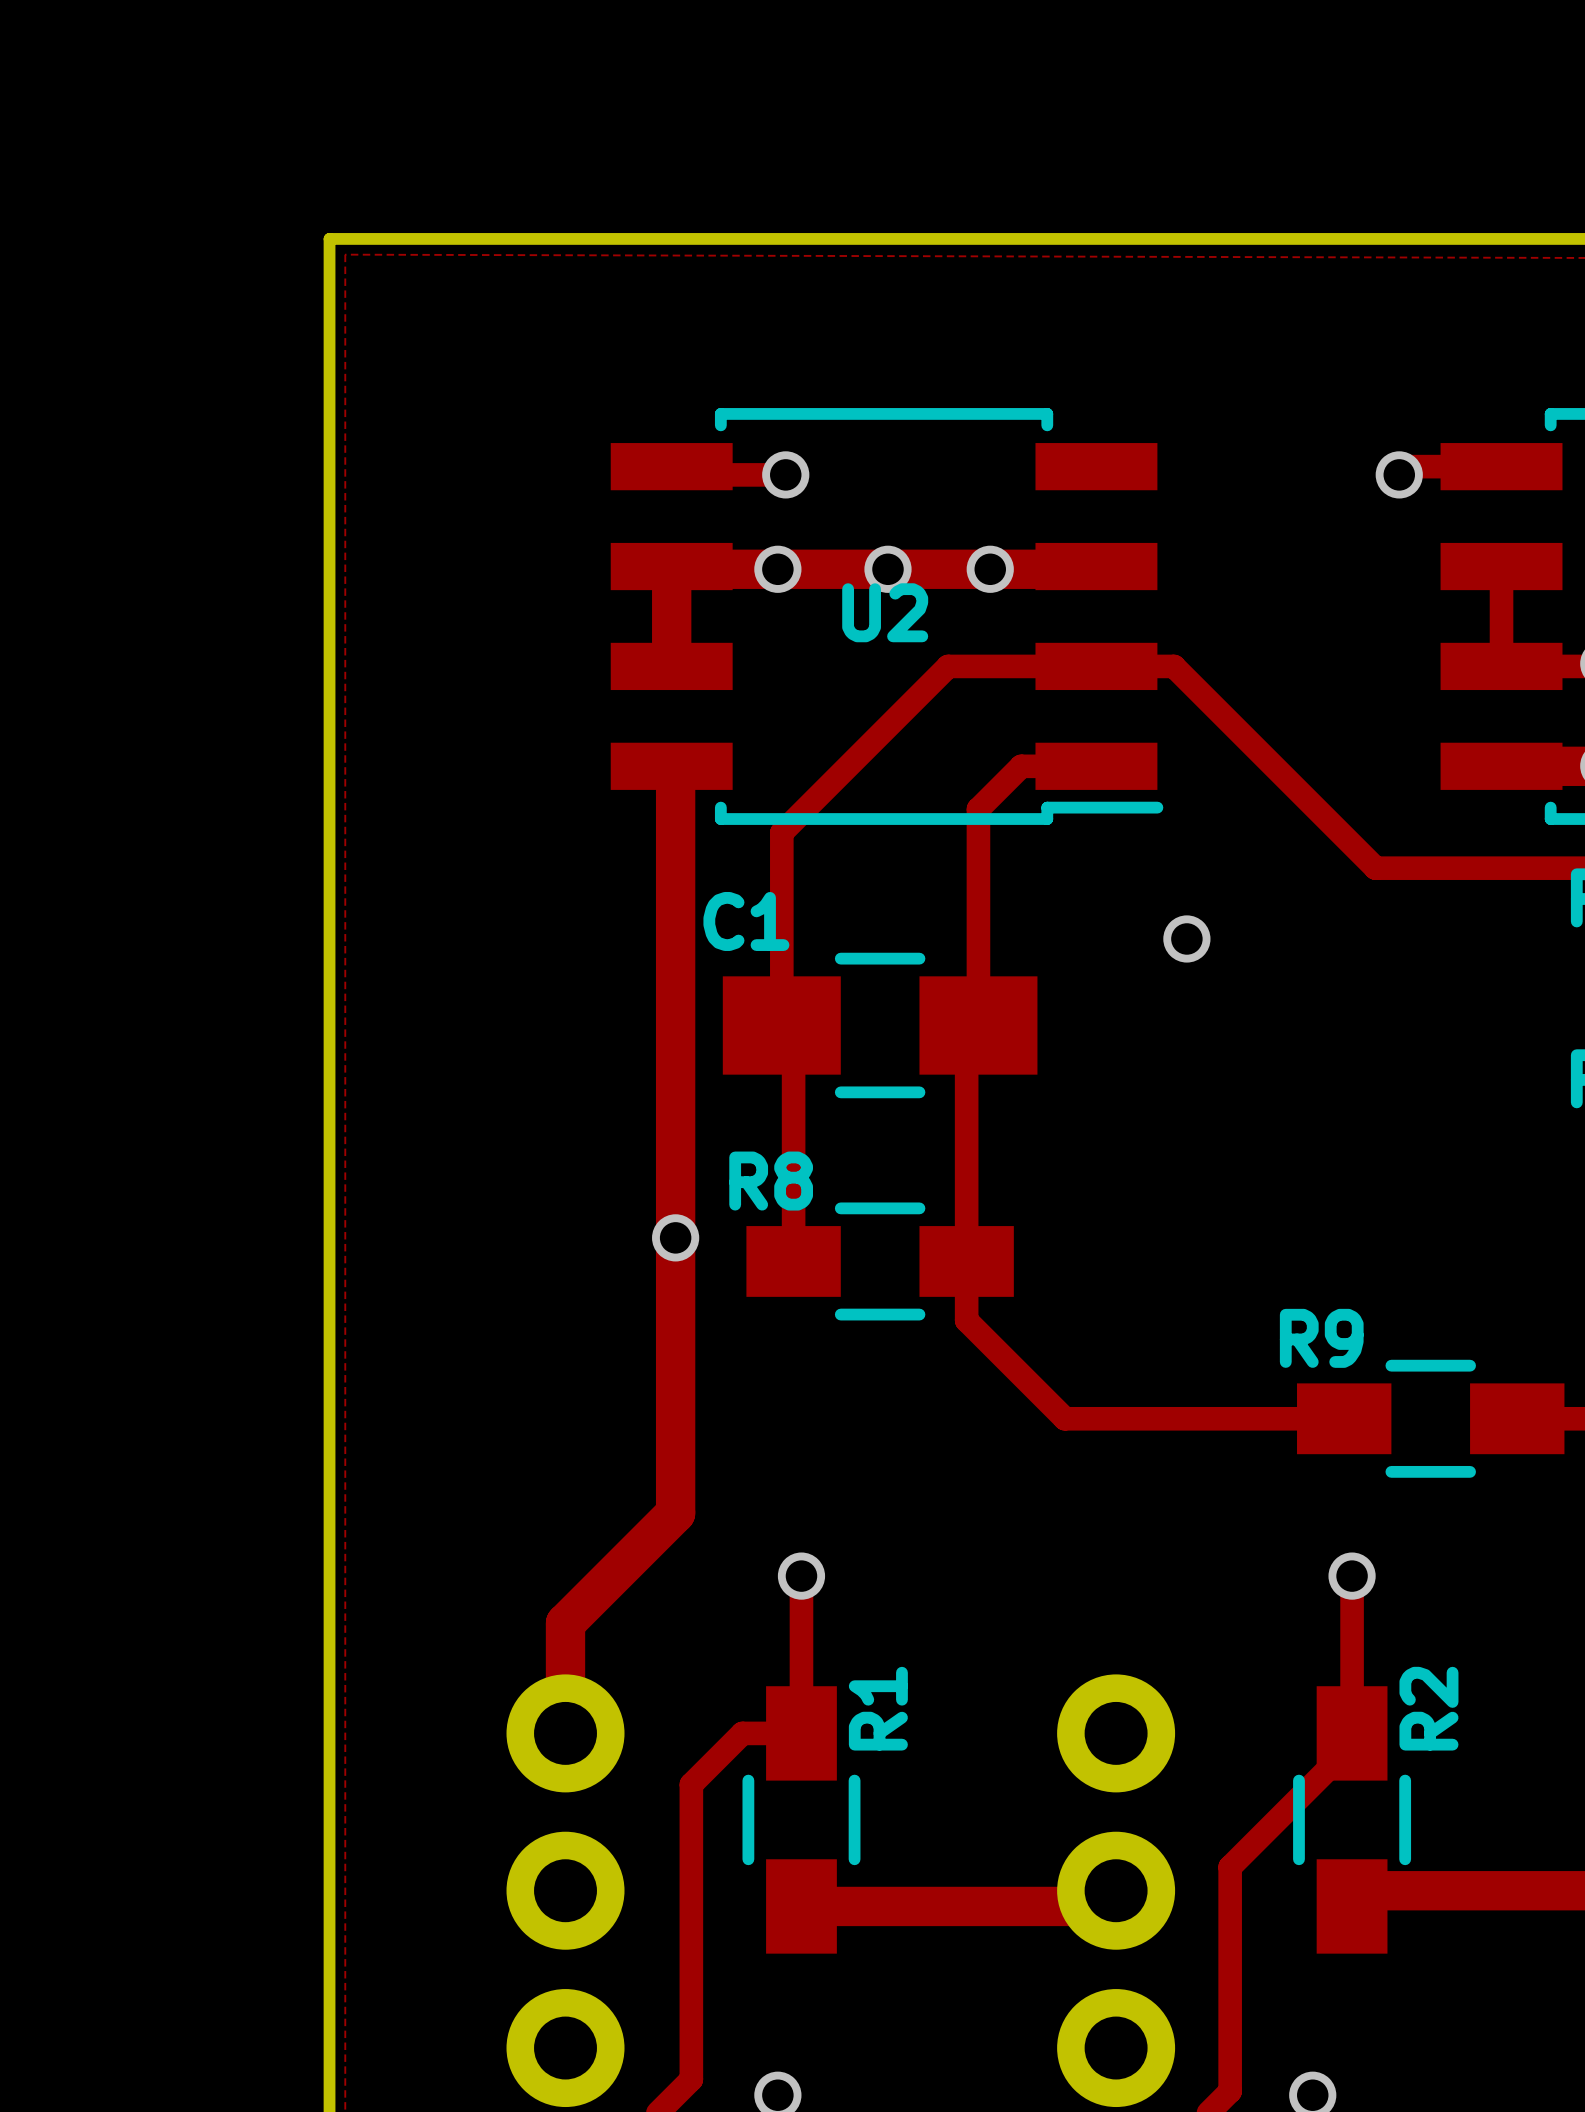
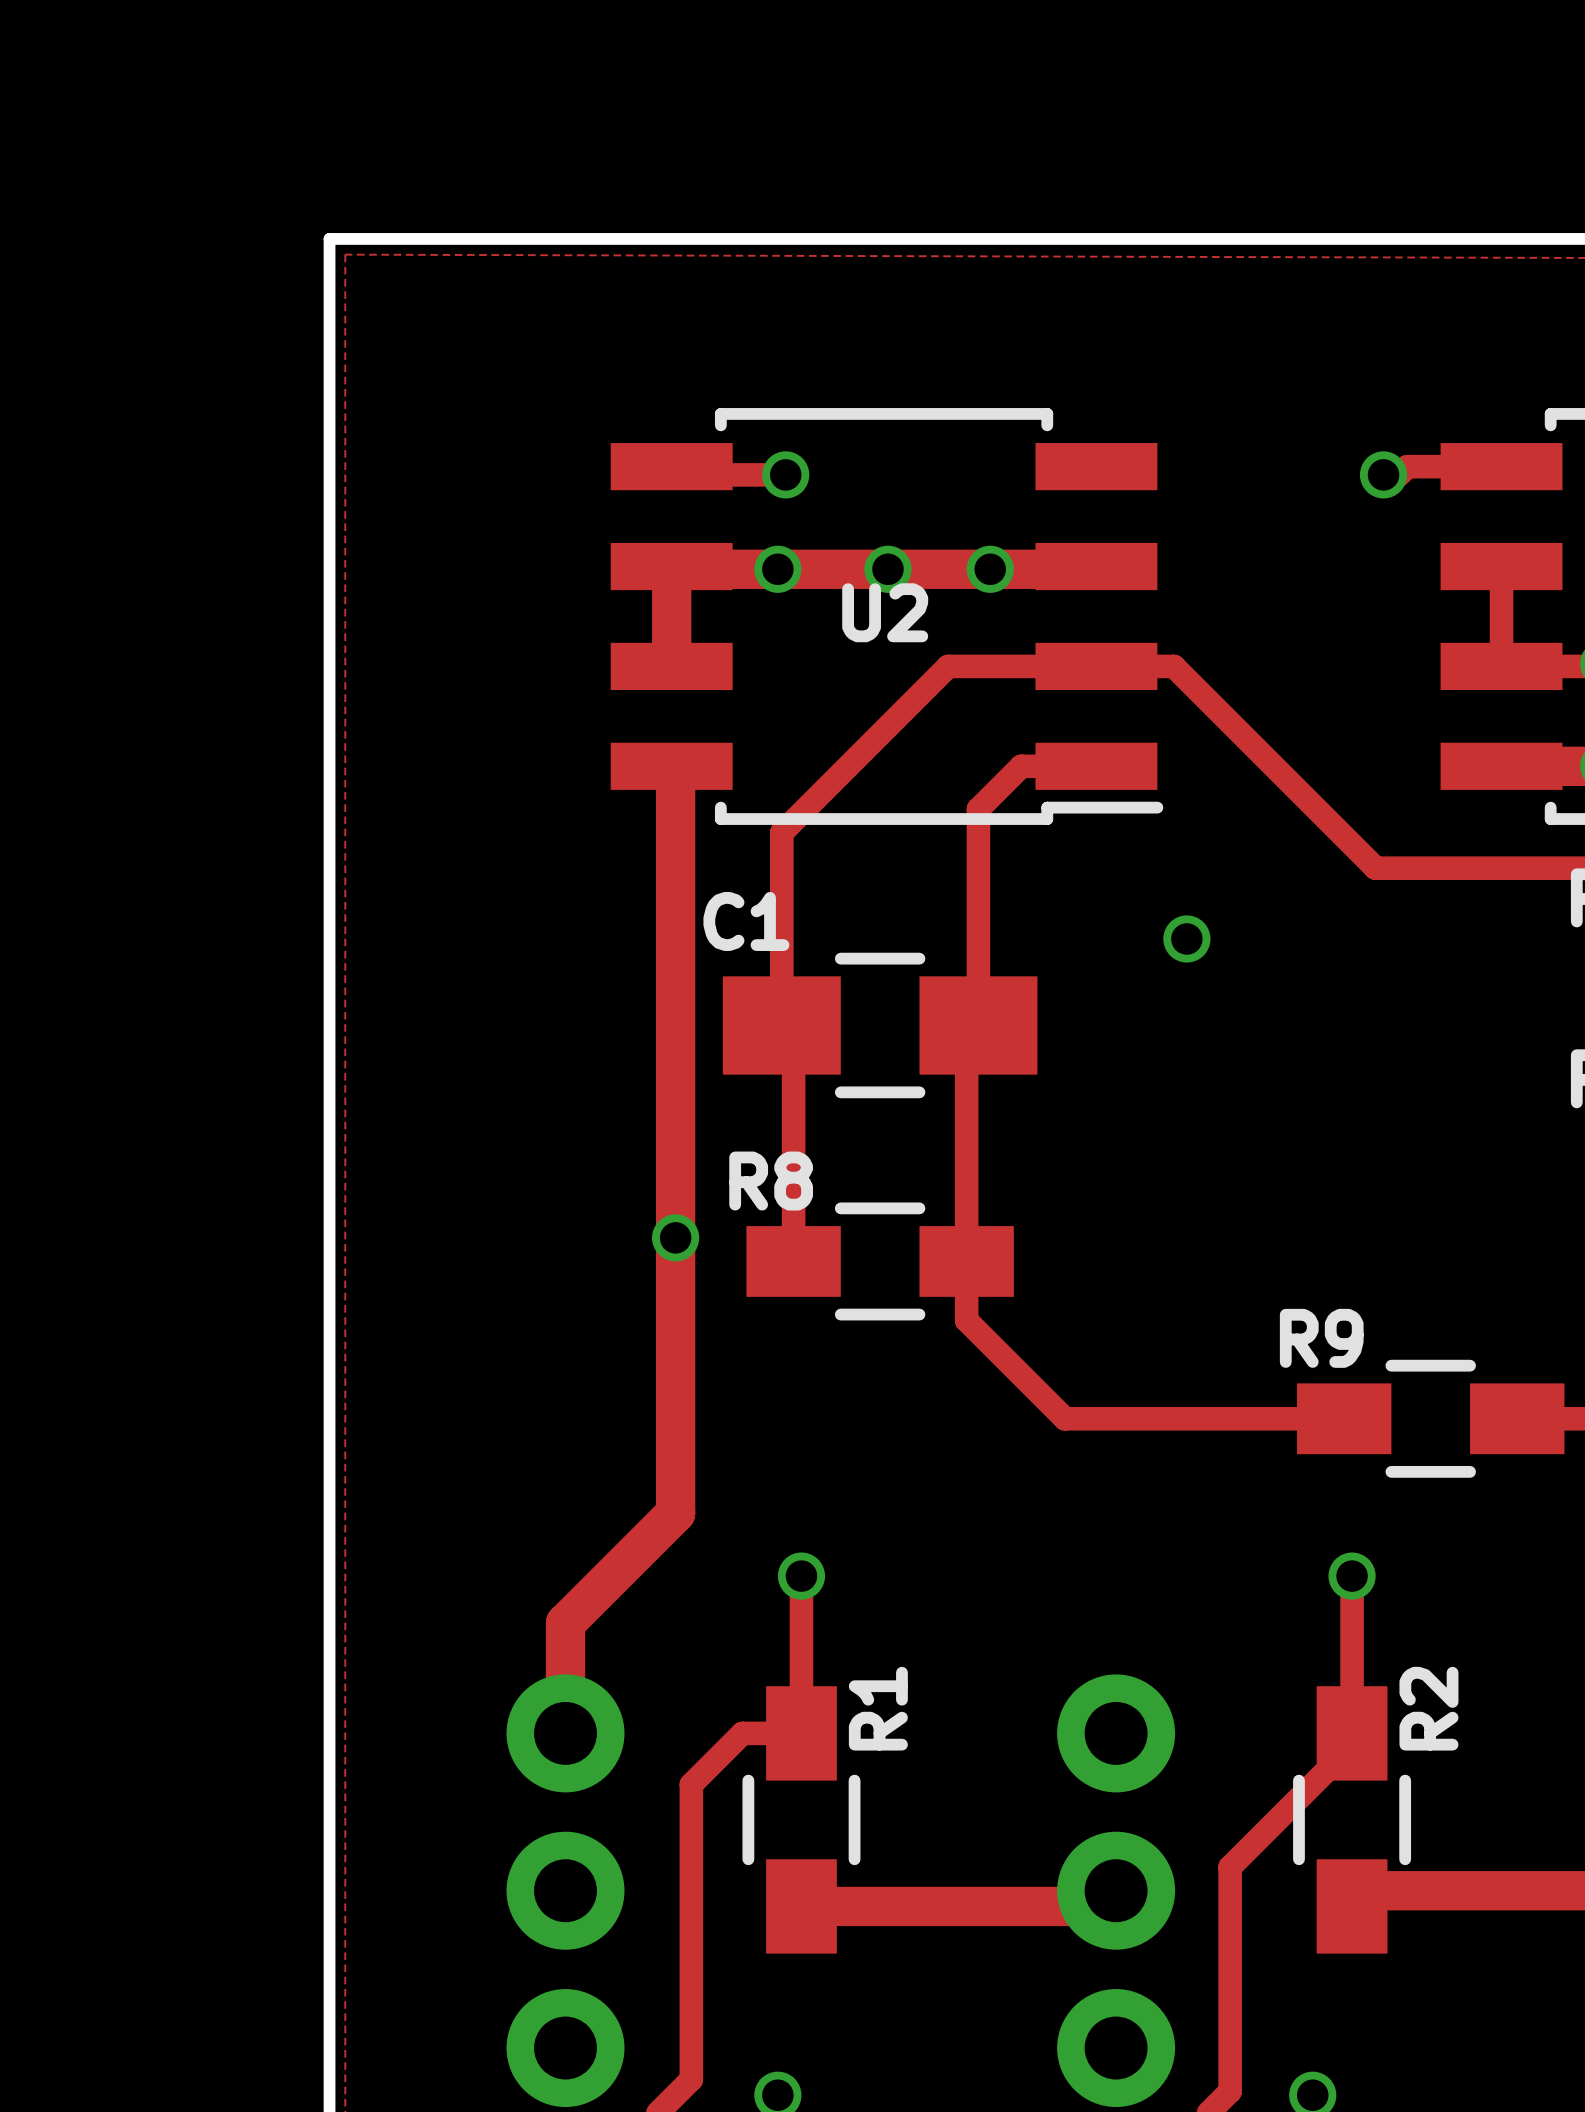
via position: (1399, 474) -> (1383, 474)

